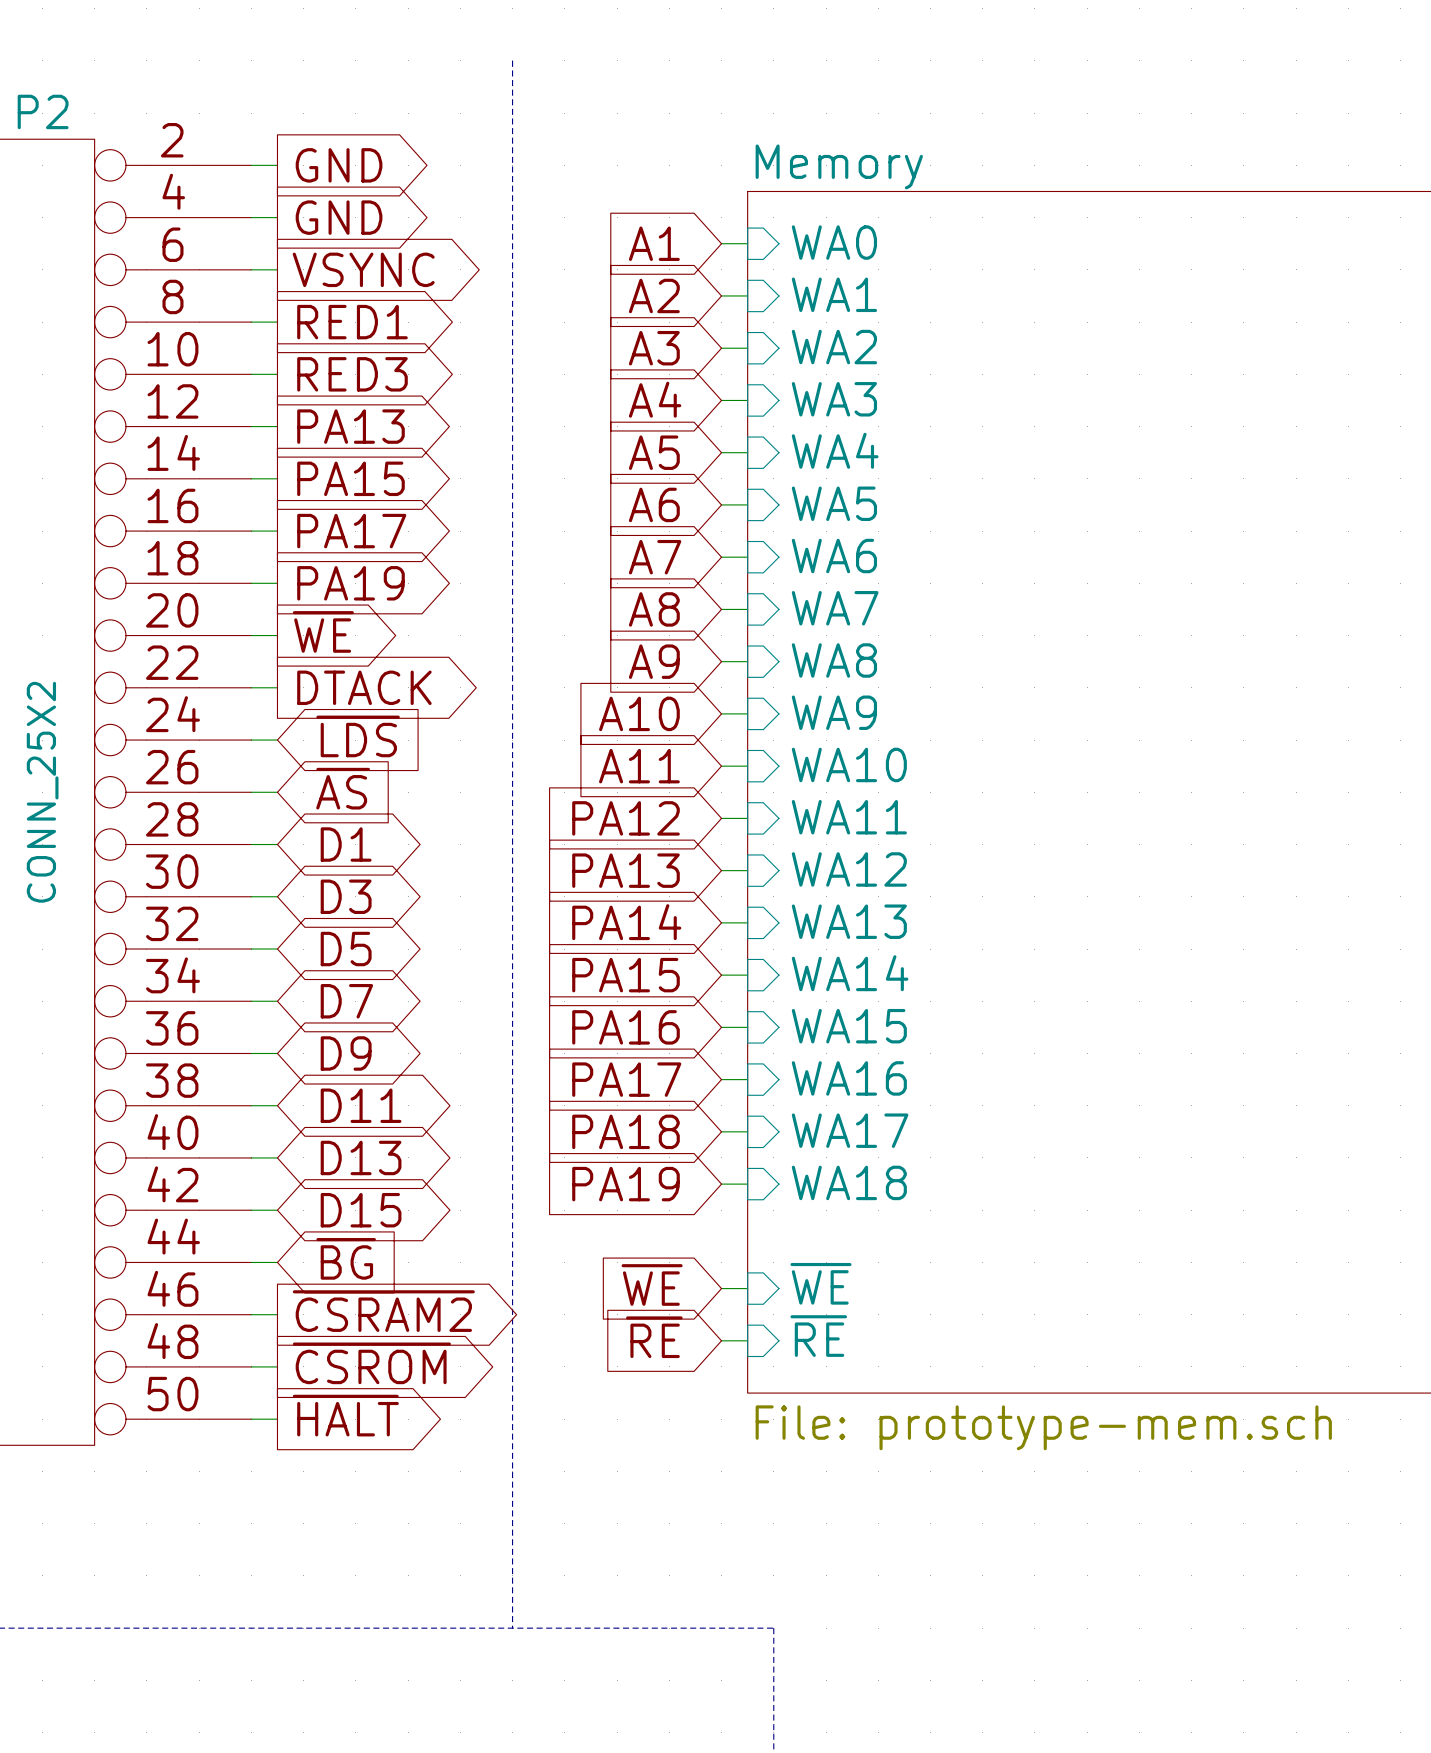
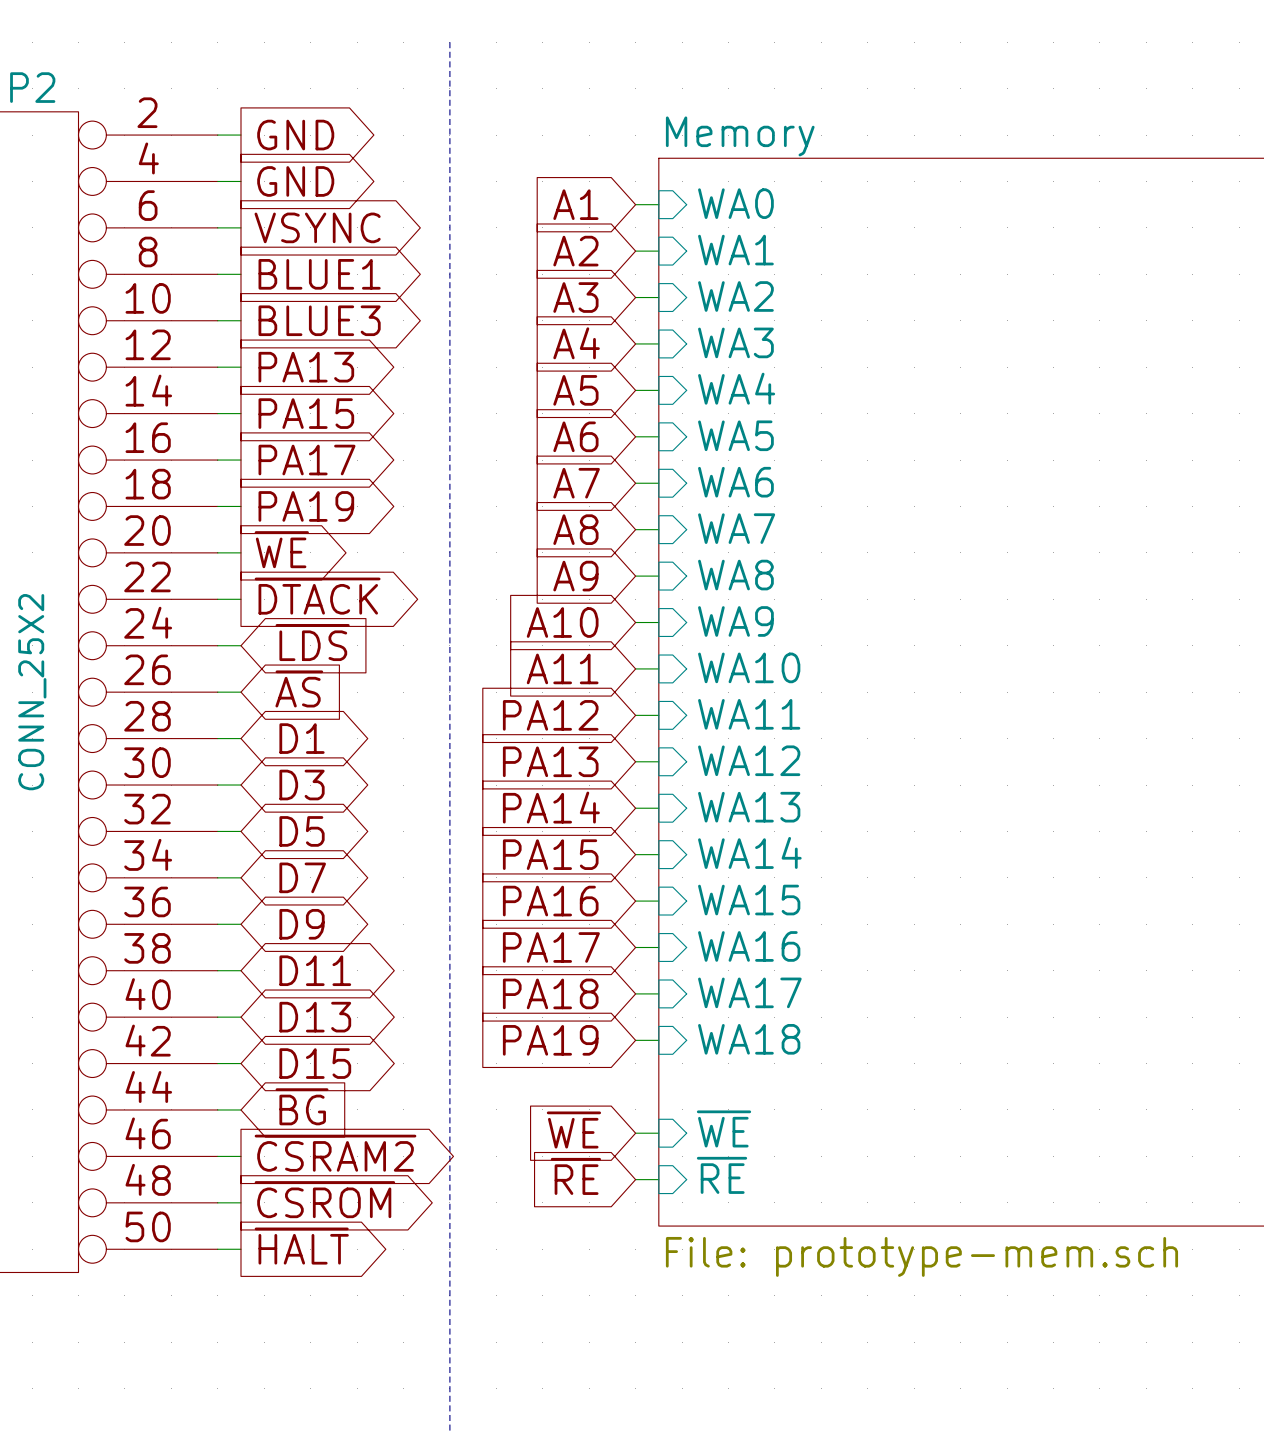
global label: RED1 (352, 322) -> BLUE1 (319, 274)
global label: RED3 (352, 374) -> BLUE3 (319, 320)
global label: DTACK (364, 687) -> ~{DTACK} (317, 596)

